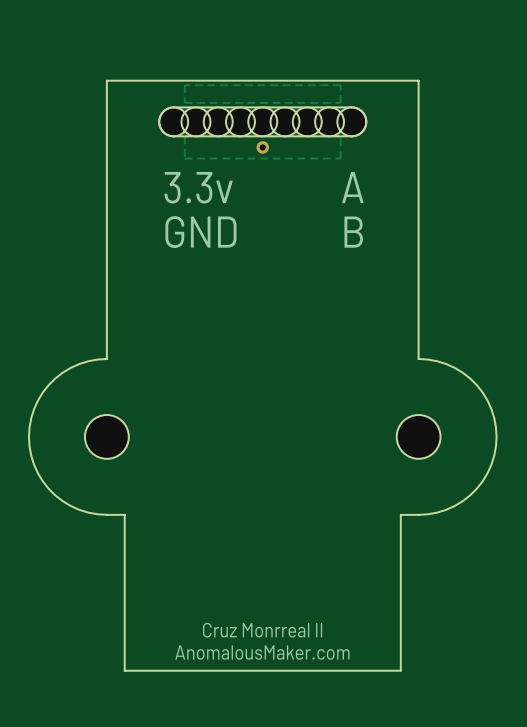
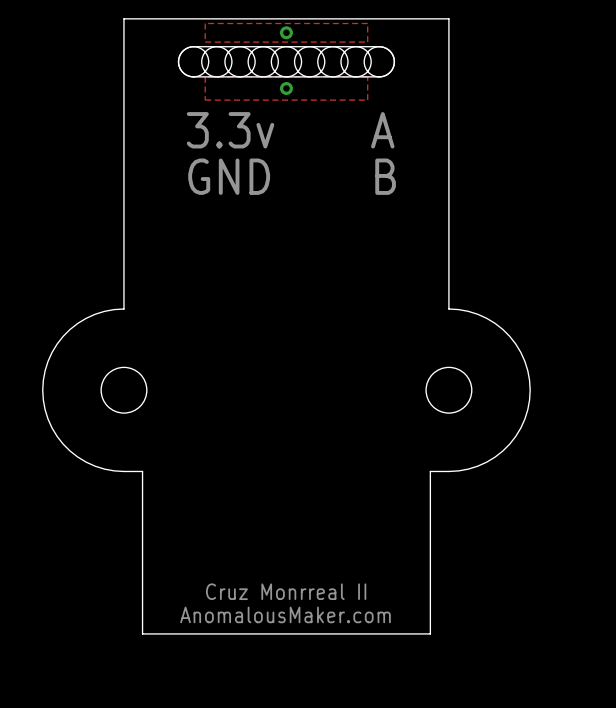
via: none -> (286, 32)

